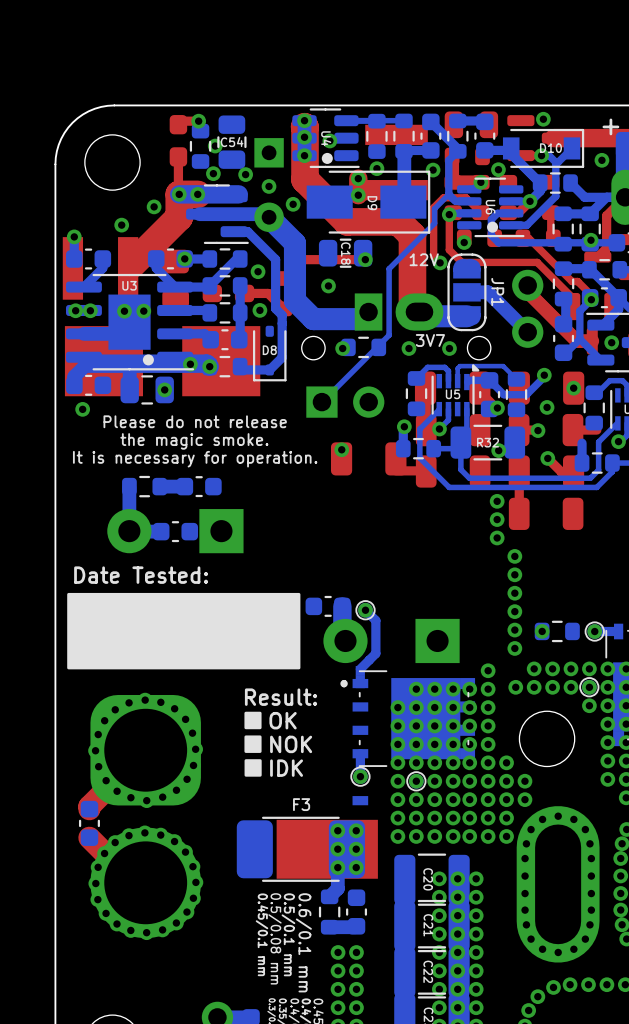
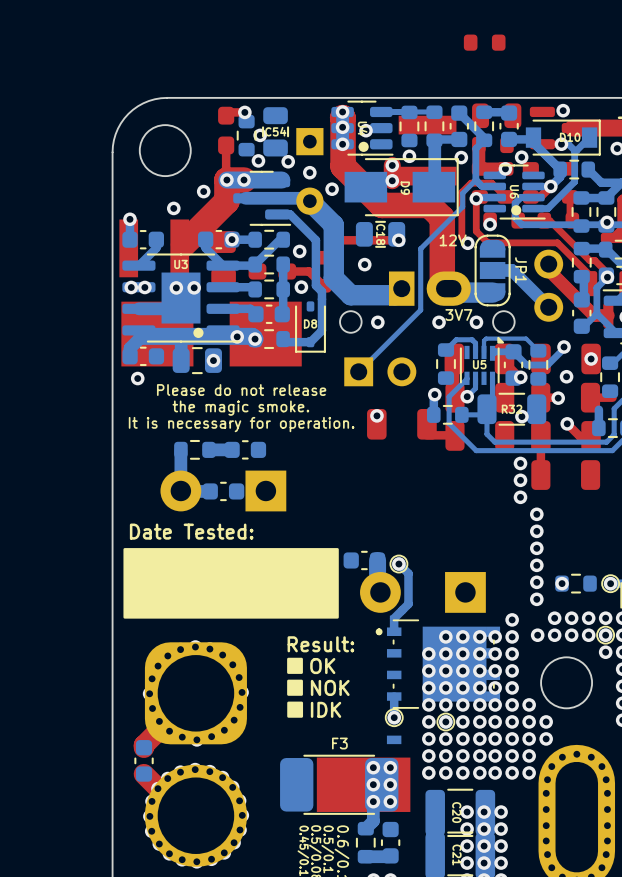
part side: bottom (363, 347) -> top (484, 42)

